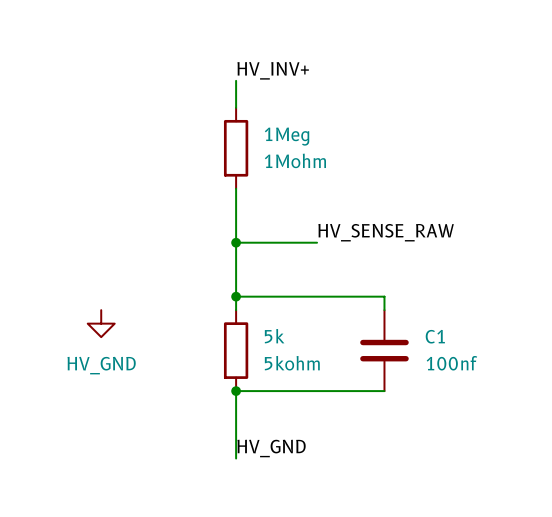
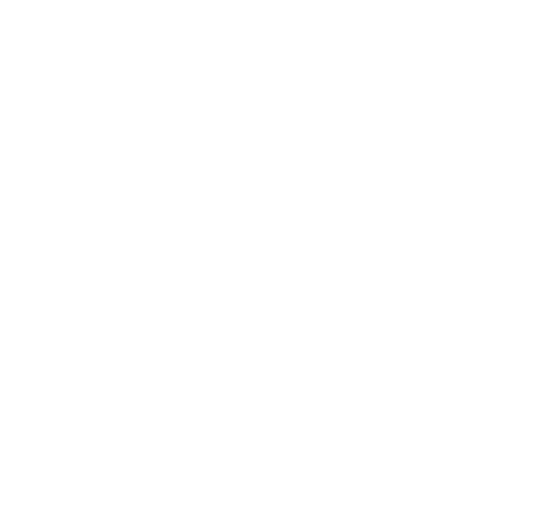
label: HV_INV+ (273, 70) -> none
wire: (236, 80) (236, 107) -> none
1Meg: 1Mohm (236, 148) -> none
wire: (236, 188) (236, 310) -> none
label: HV_SENSE_RAW (386, 232) -> none
wire: (236, 242) (317, 242) -> none
junction: (236, 242) -> none
wire: (236, 296) (384, 296) (384, 310) -> none
junction: (236, 296) -> none
power symbol: HV_GND (101, 323) -> none
5k: 5kohm (236, 350) -> none
C1: 100nf (384, 350) -> none
junction: (236, 391) -> none
wire: (384, 391) (236, 391) (236, 458) -> none
label: HV_GND (271, 448) -> none

